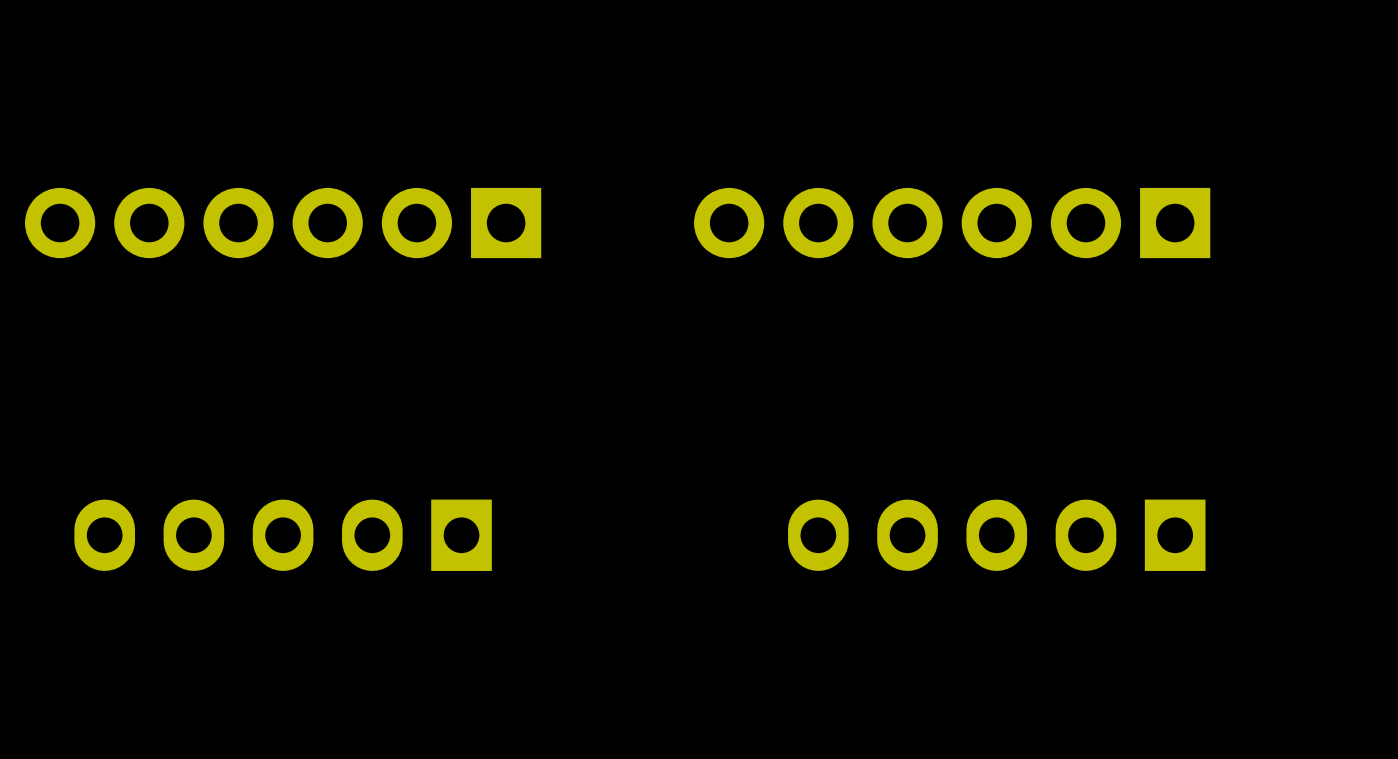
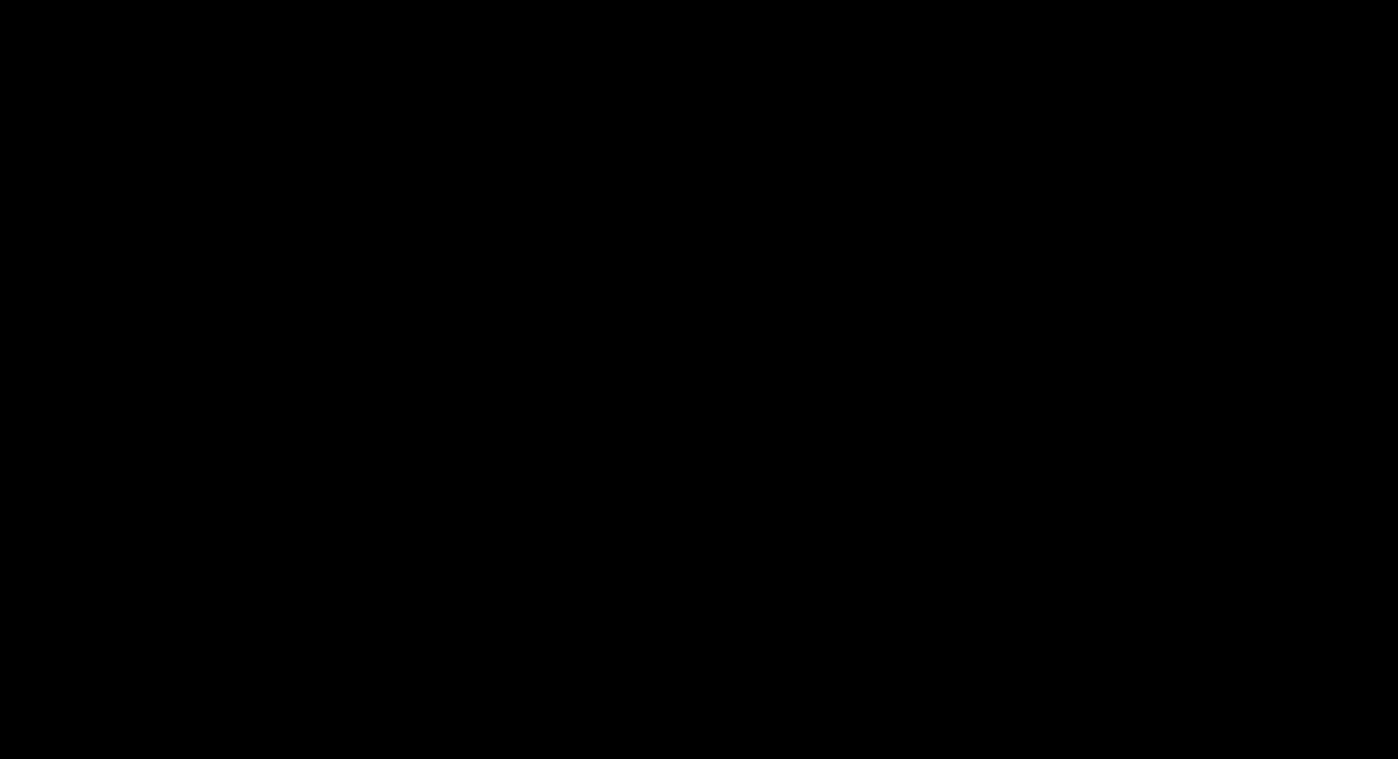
part: (283, 223) -> none
part: (952, 223) -> none
part: (283, 535) -> none
part: (996, 535) -> none

